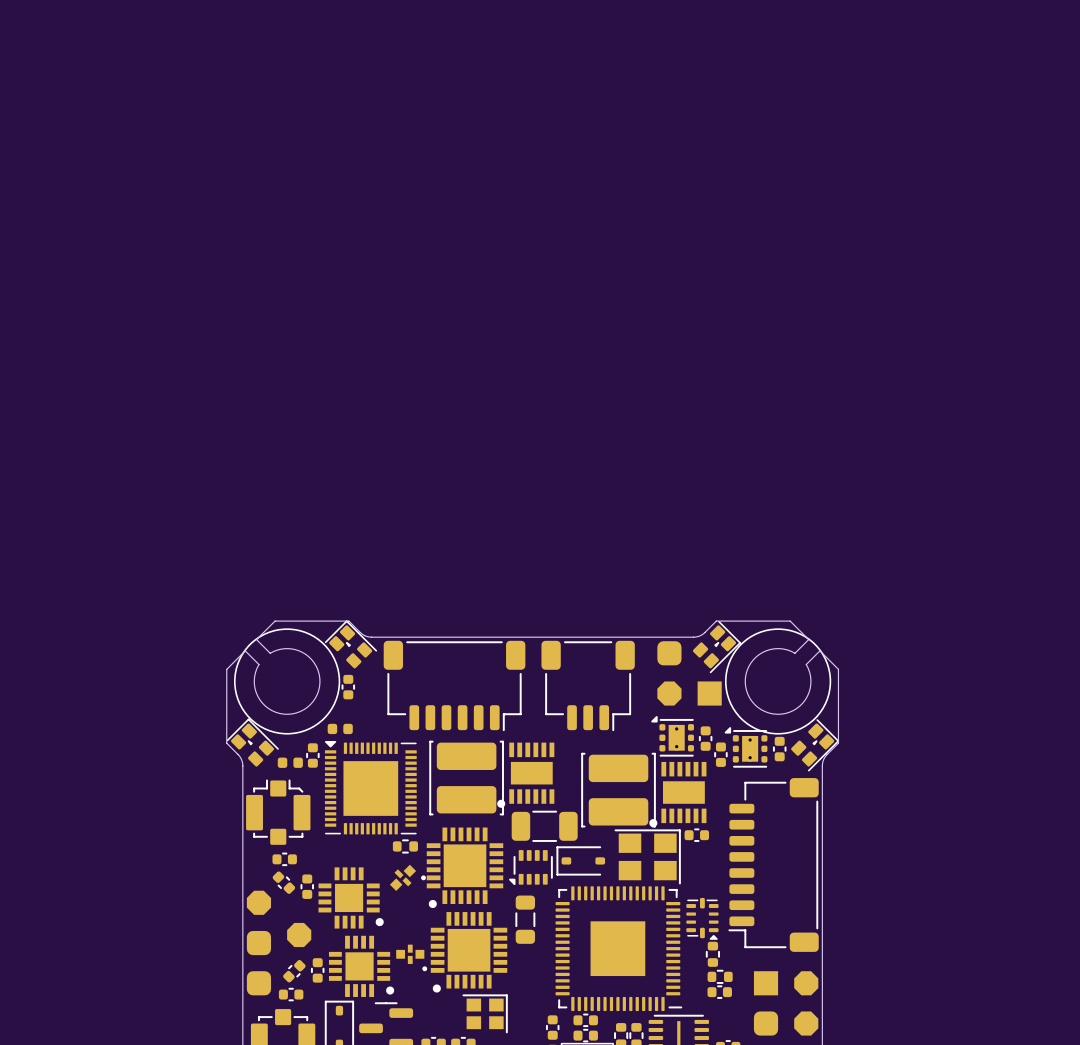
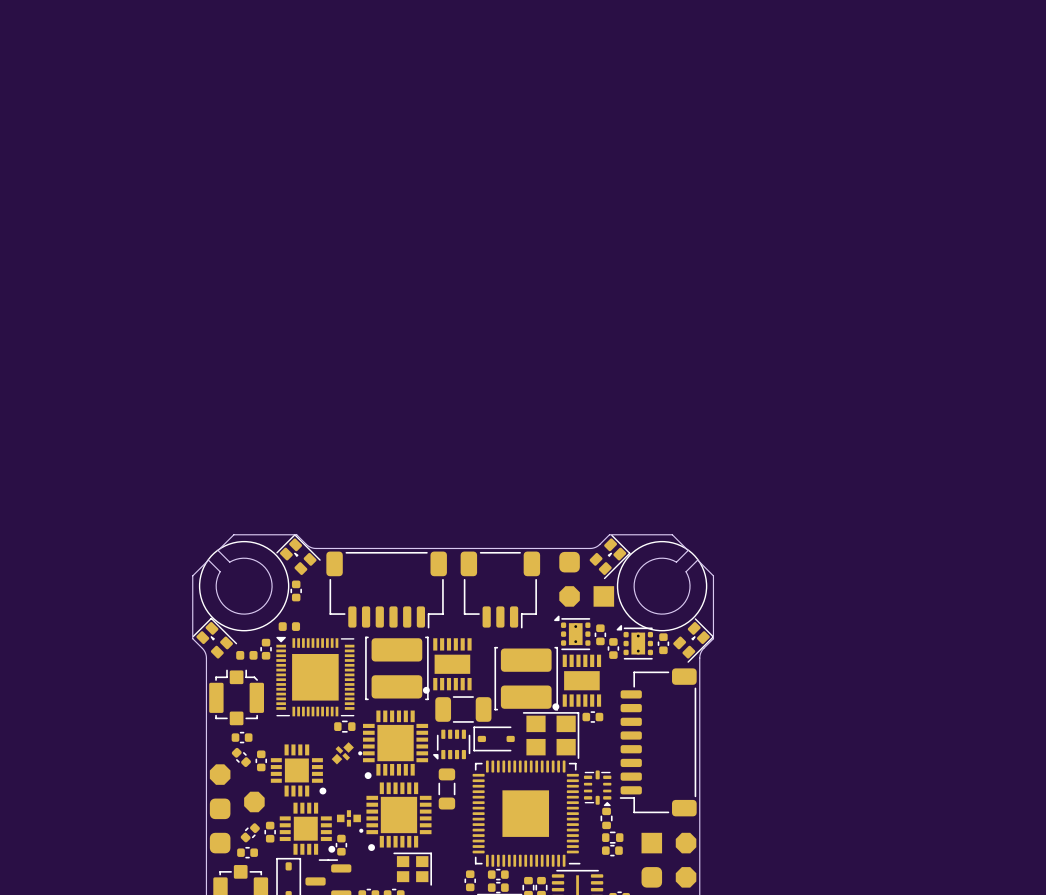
part: none -> (341, 845)

